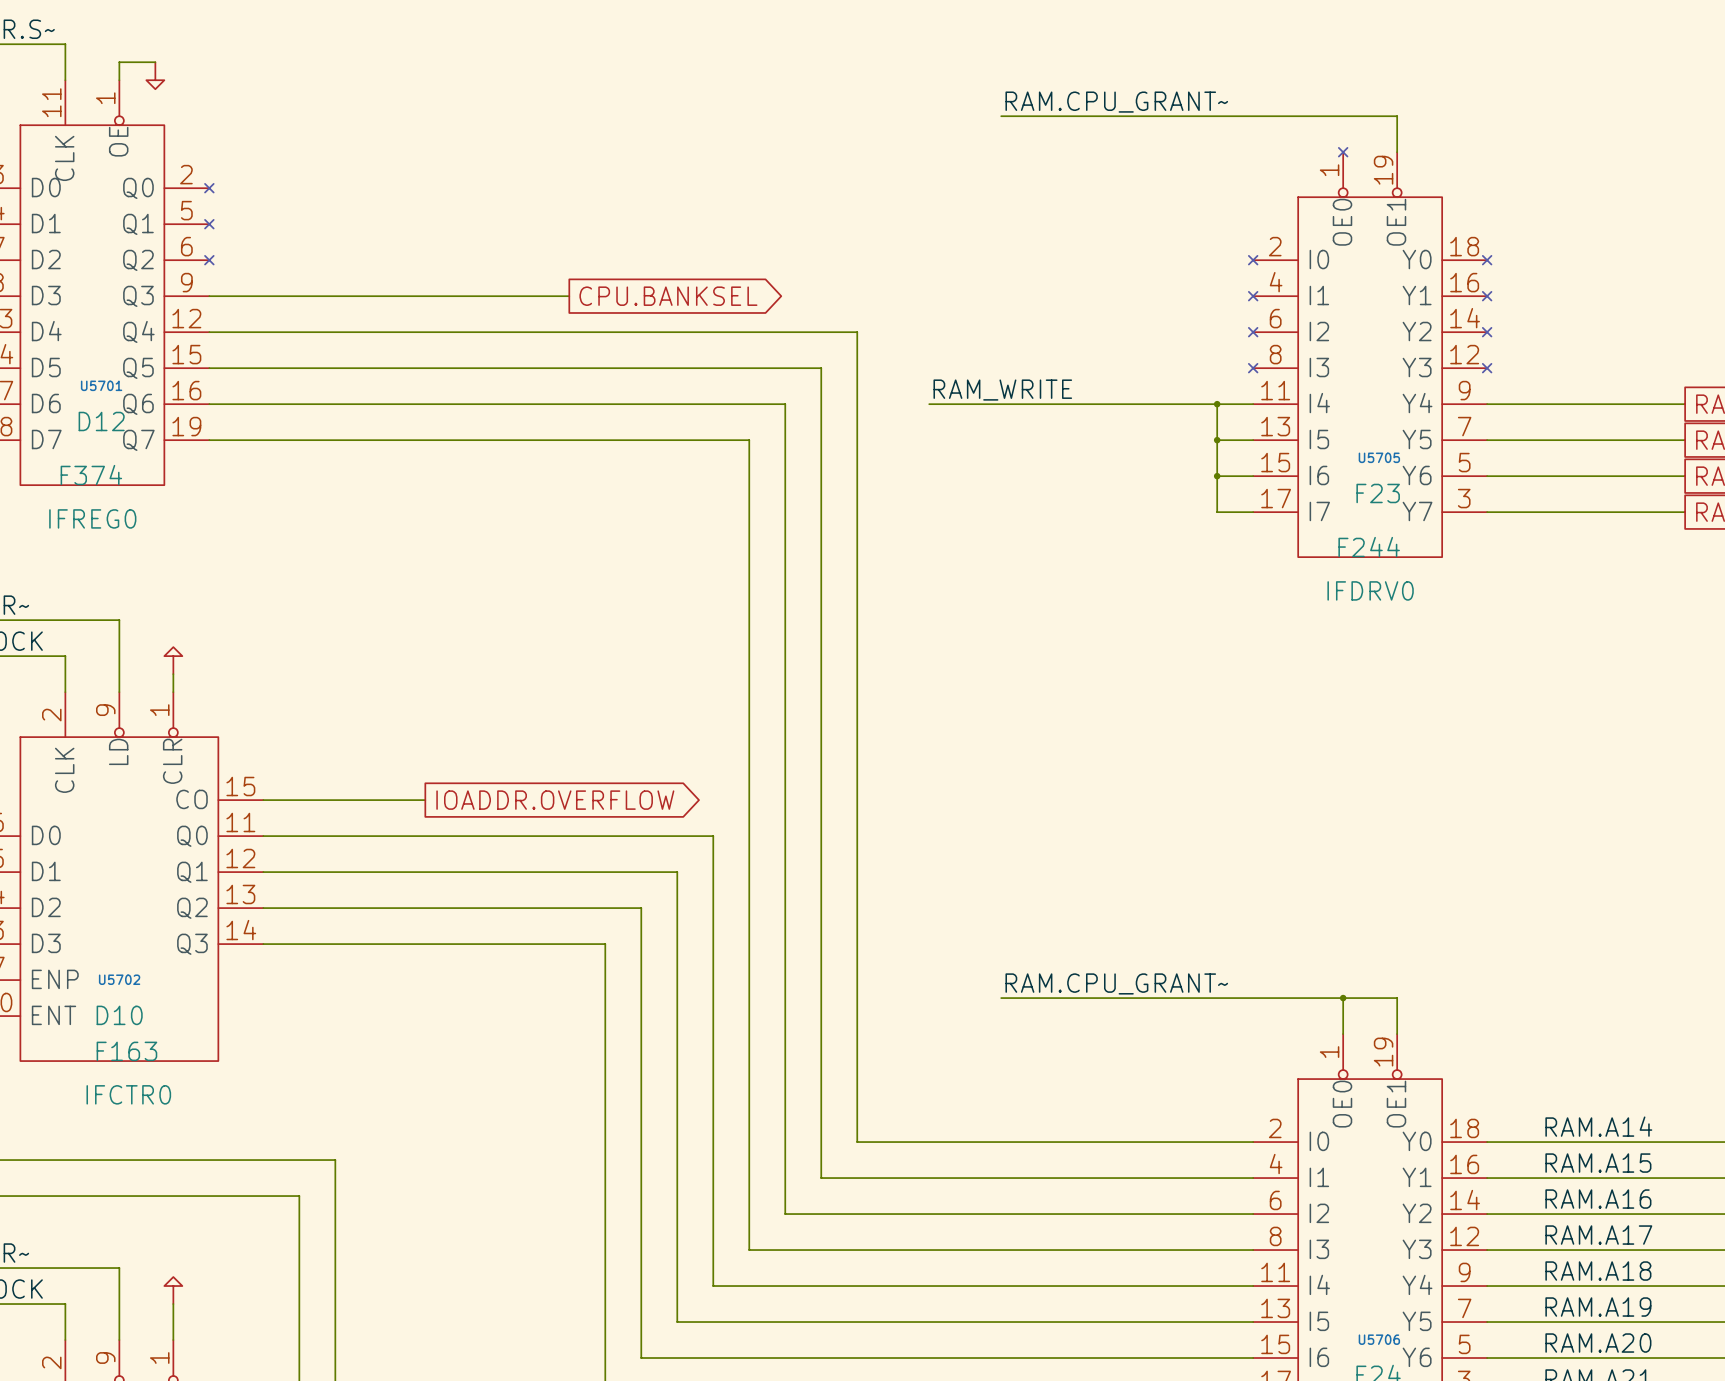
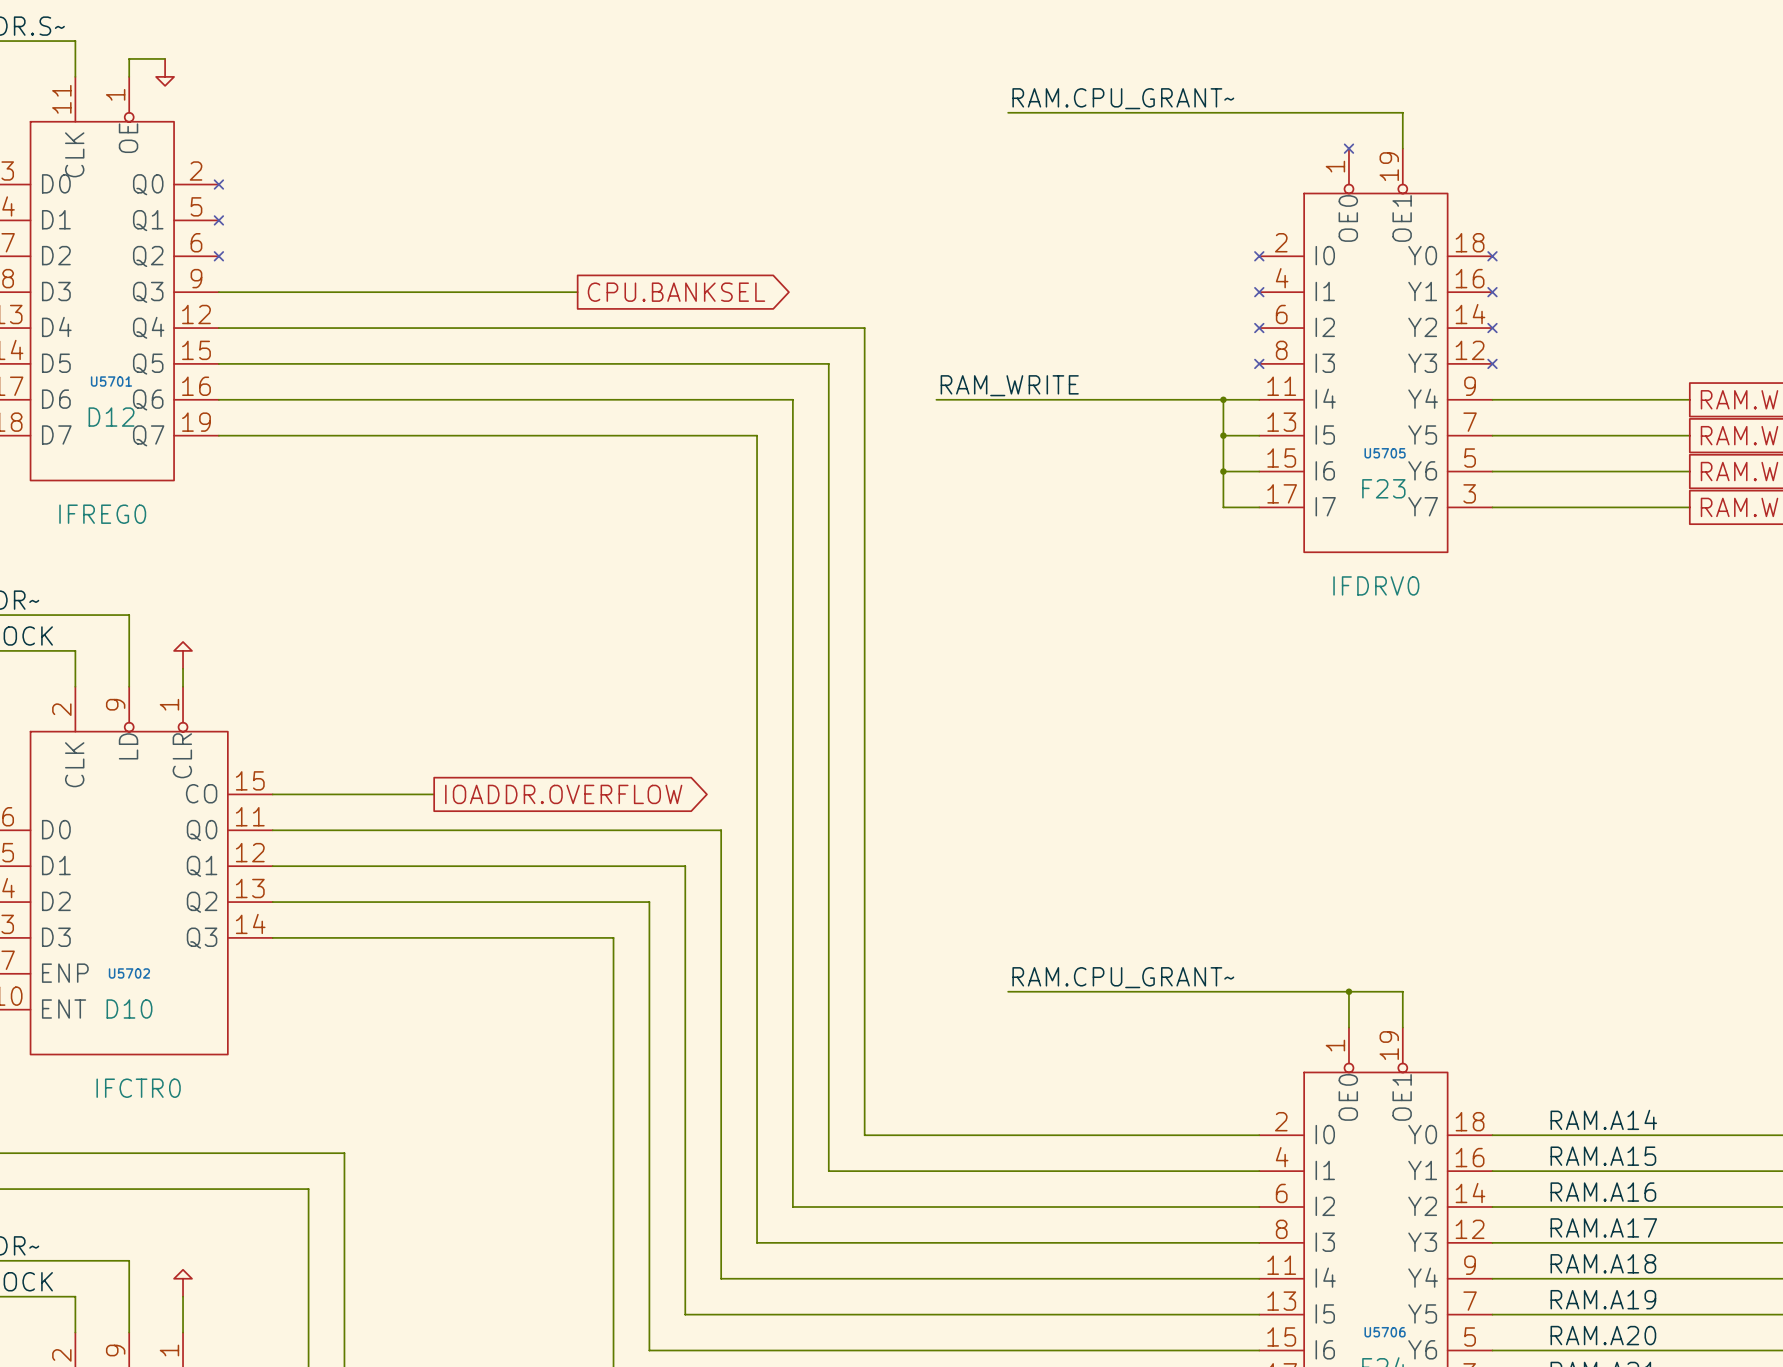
U5701 value: F374 (91, 475) -> none
U5705 value: F244 (1369, 547) -> none
U5702 value: F163 (126, 1051) -> none

